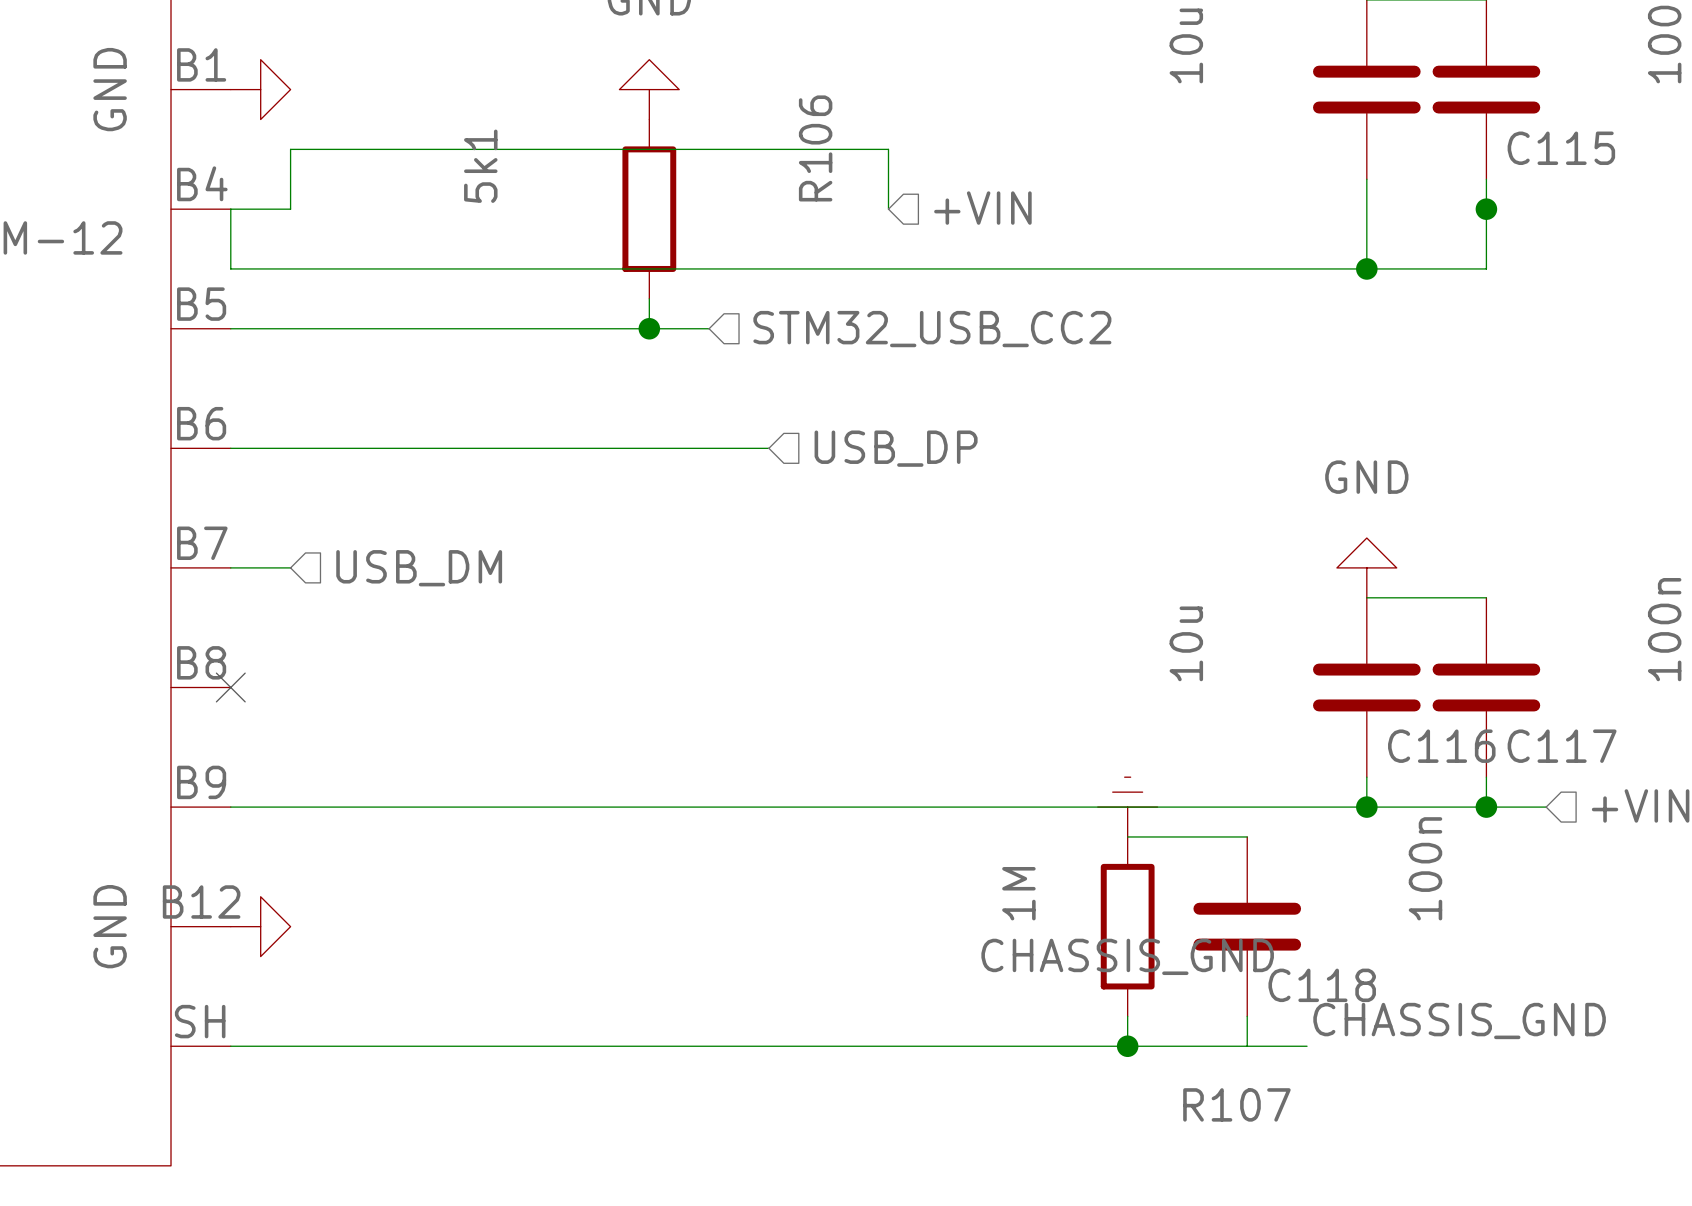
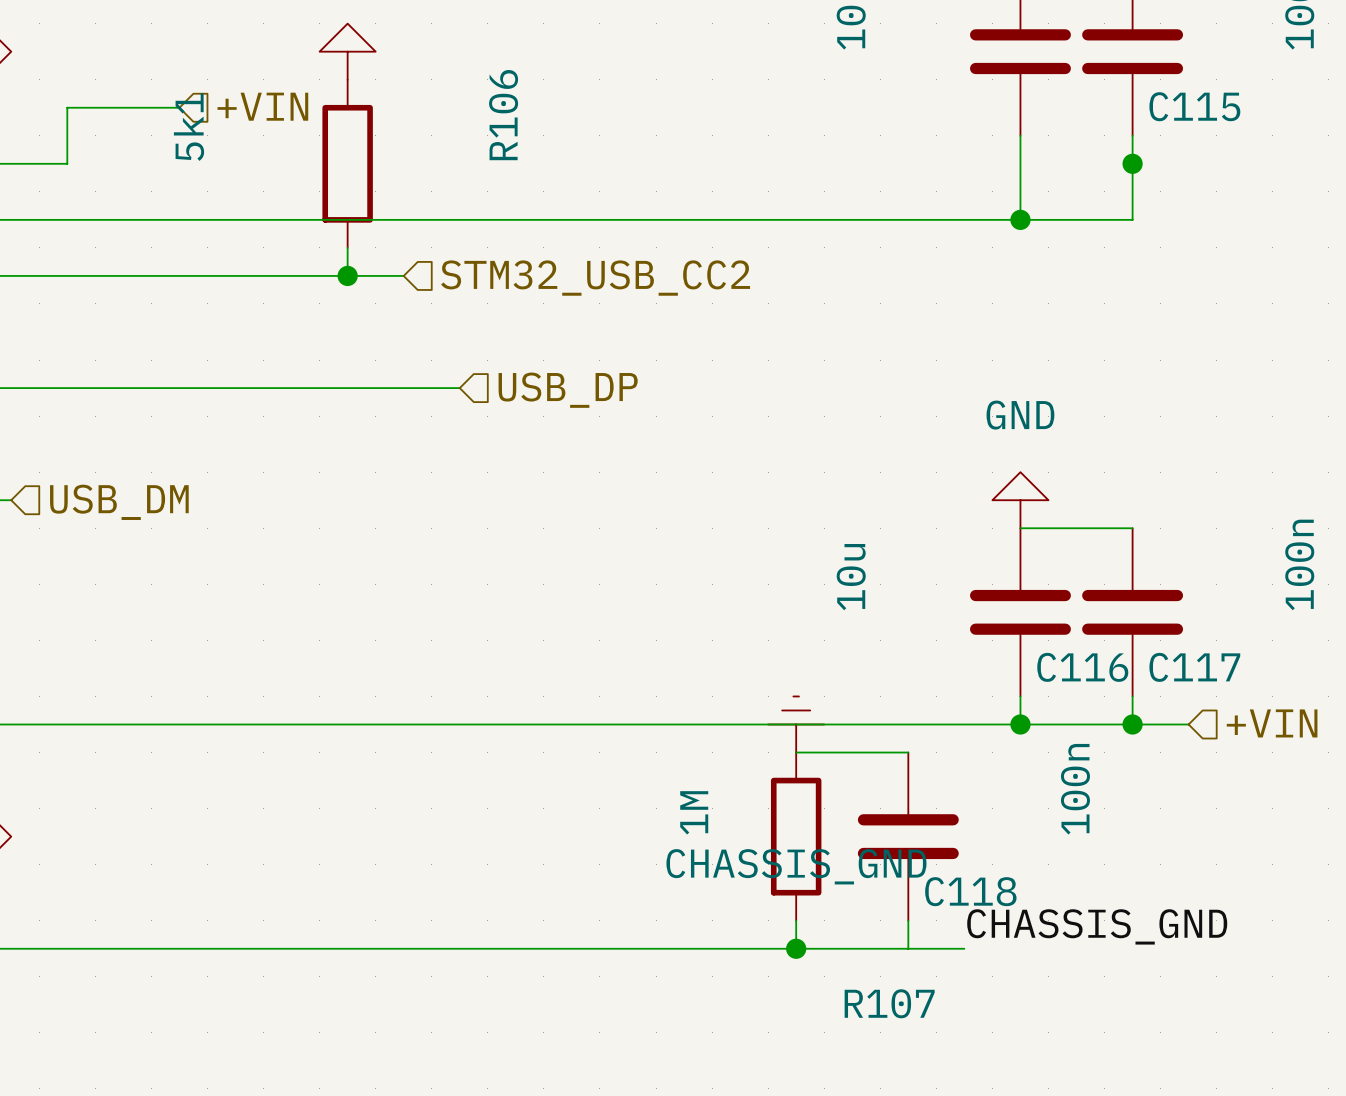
wire: (350, 149) (290, 149) (290, 209) -> (67, 107) (67, 163) (11, 163)
wire: (469, 149) (888, 149) (888, 209) -> none
hierarchical label position: +VIN (982, 208) -> +VIN (262, 106)

